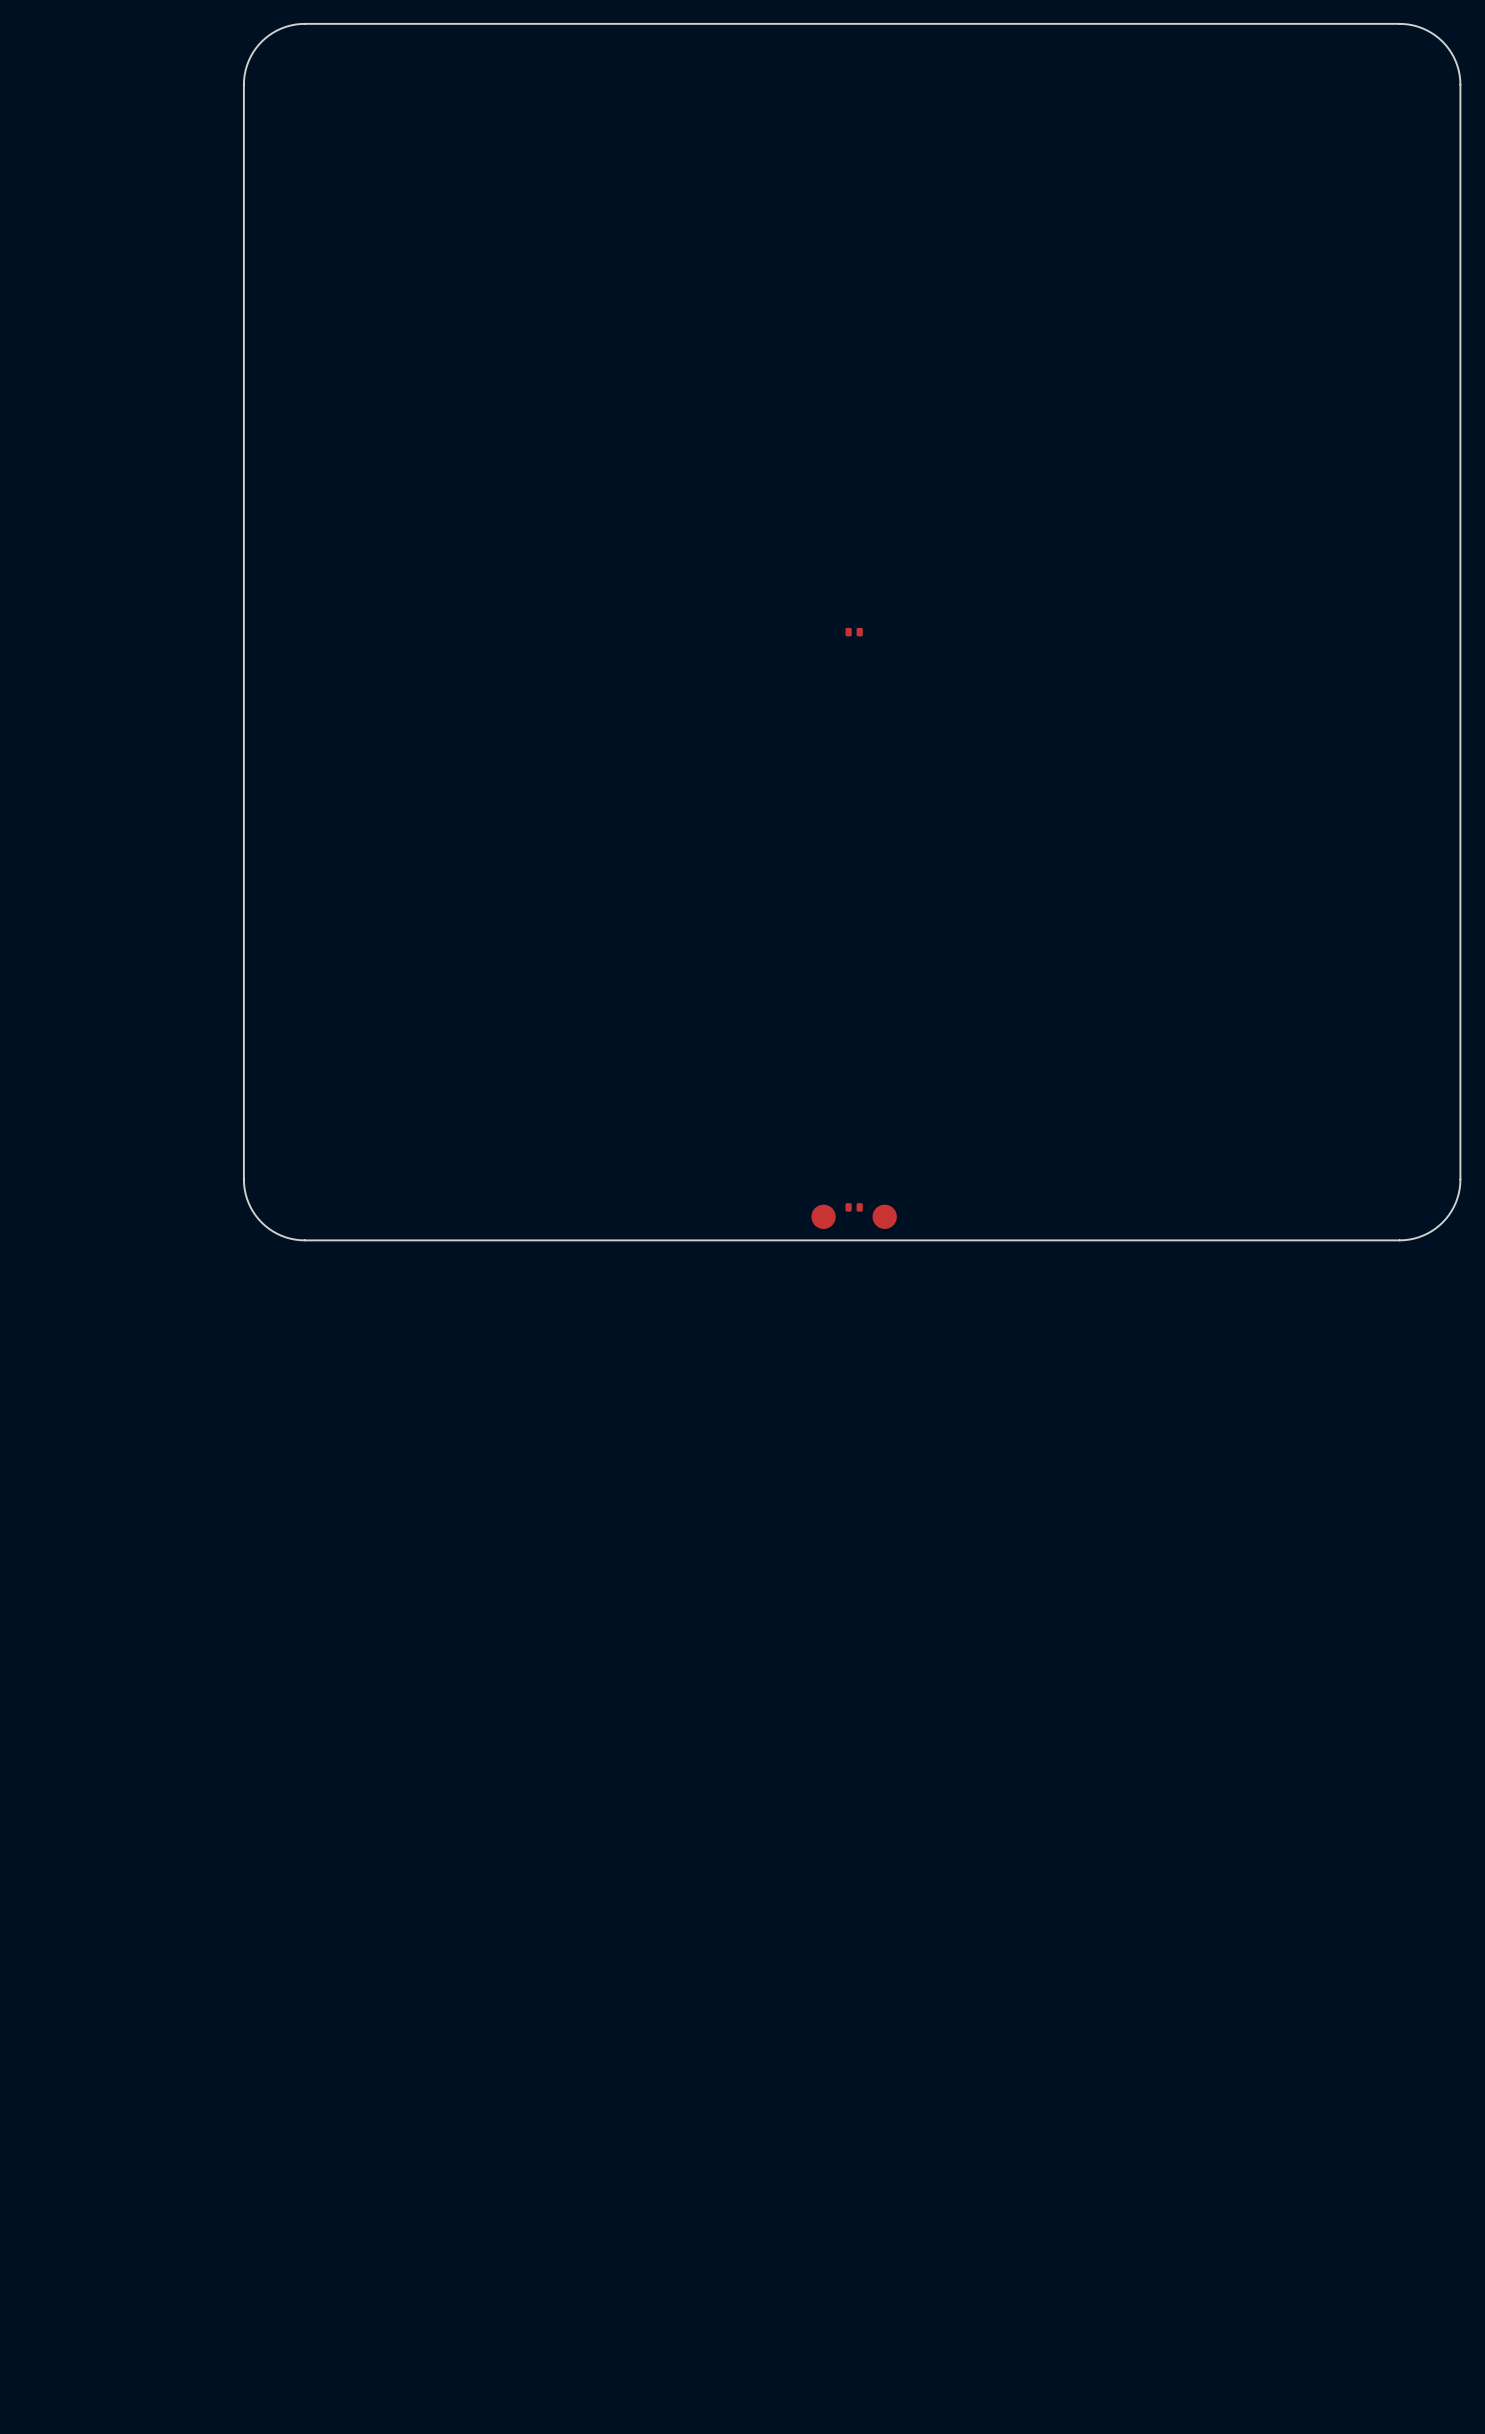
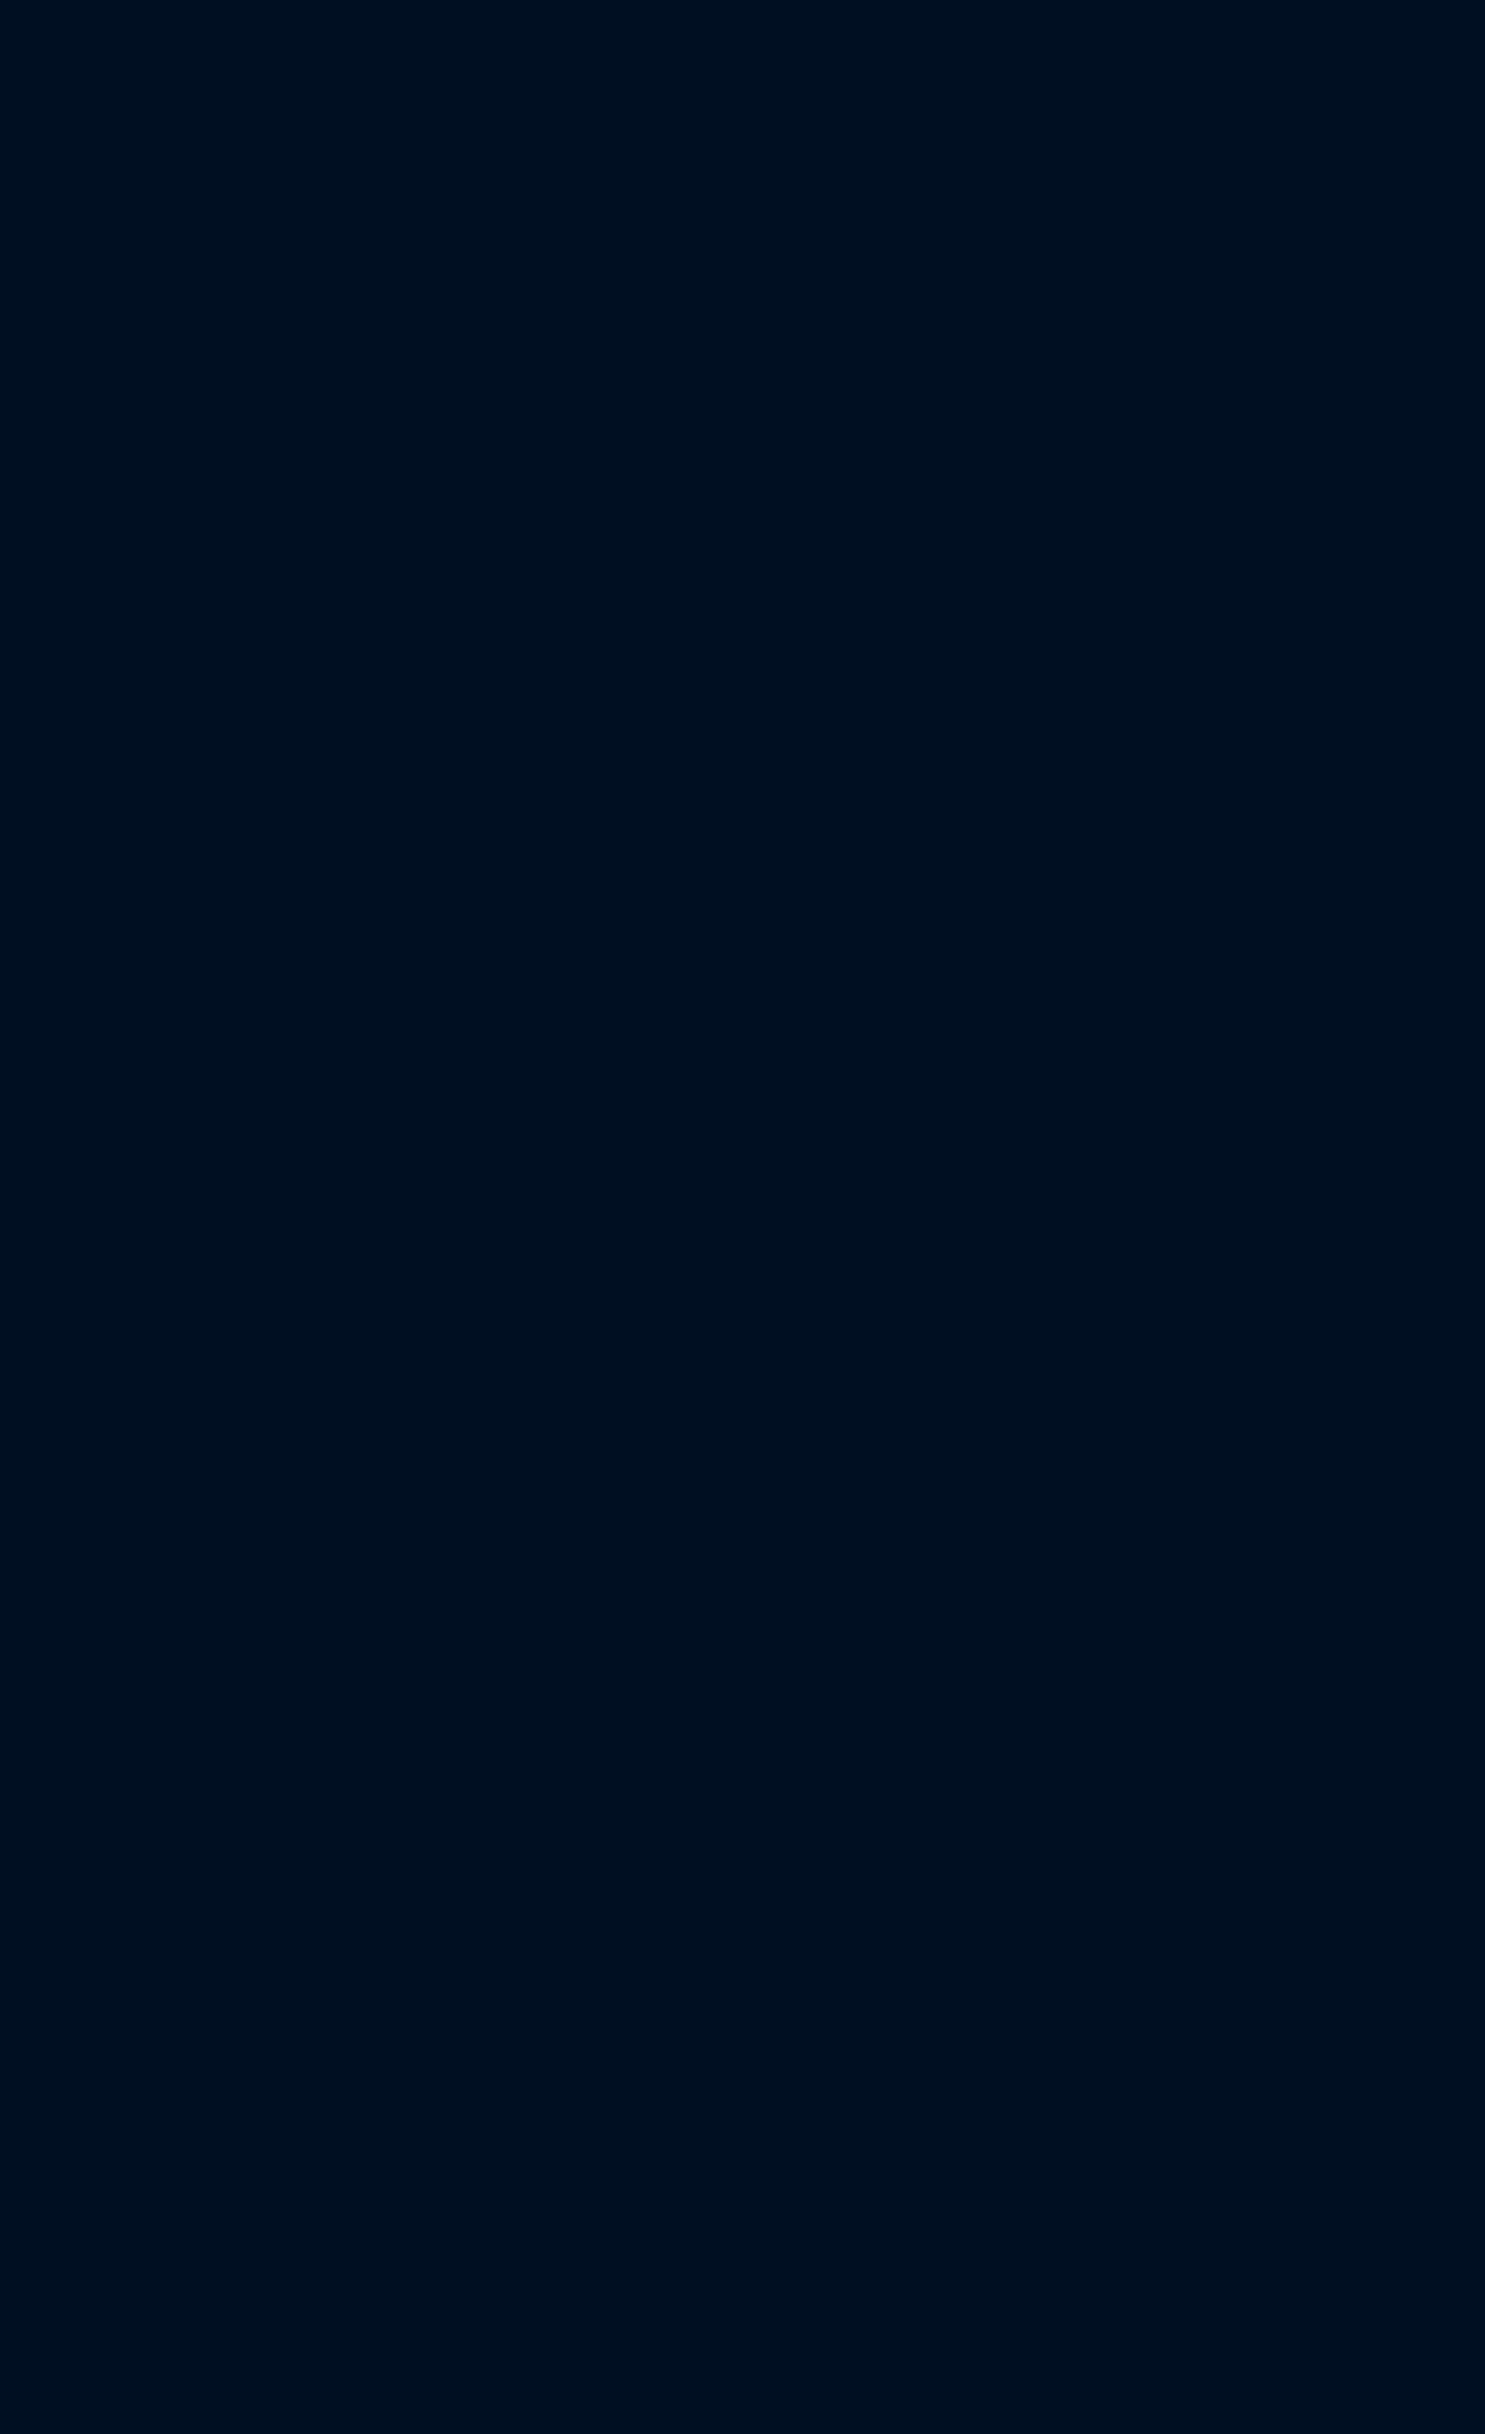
board edge: (1399, 23) (304, 23) (281, 28) (261, 41) (248, 61) (243, 84) (243, 1179) (248, 1202) (261, 1222) (281, 1235) (304, 1240) (1399, 1240) (1422, 1235) (1442, 1222) (1455, 1202) (1460, 1179) (1460, 84) (1455, 61) (1442, 41) (1422, 28) (1399, 23) -> none
part: (854, 632) -> none
part: (854, 1207) -> none
part: (823, 1216) -> none
part: (884, 1216) -> none

